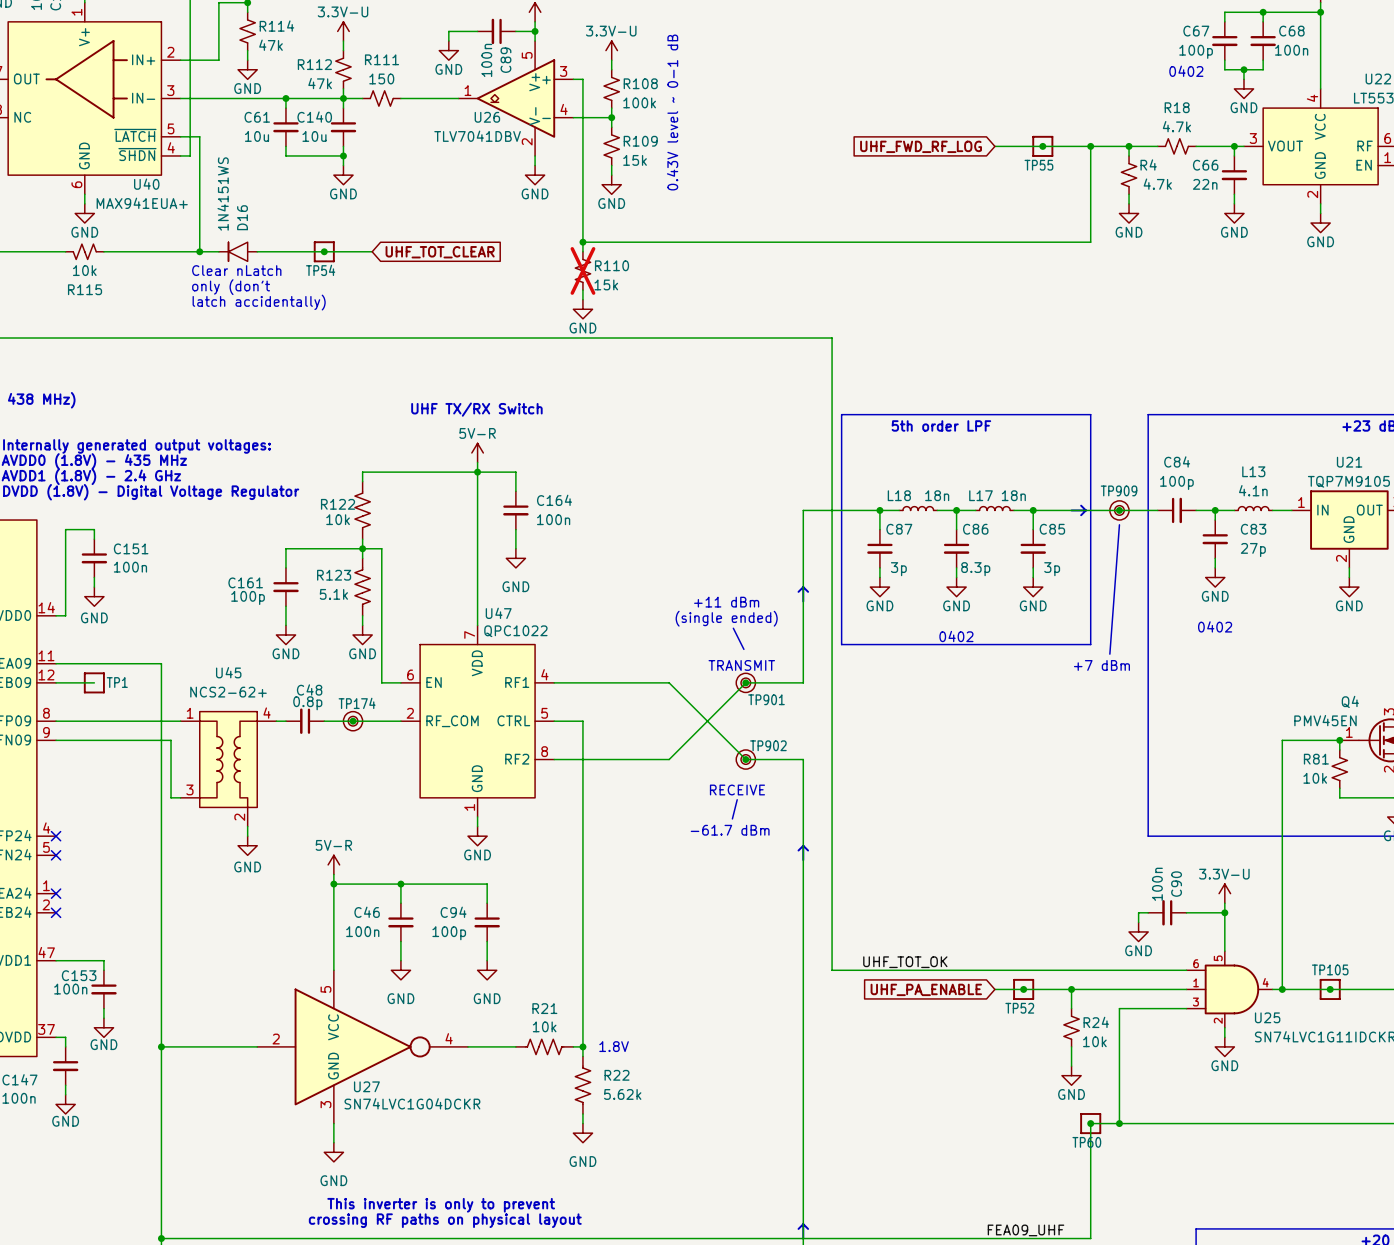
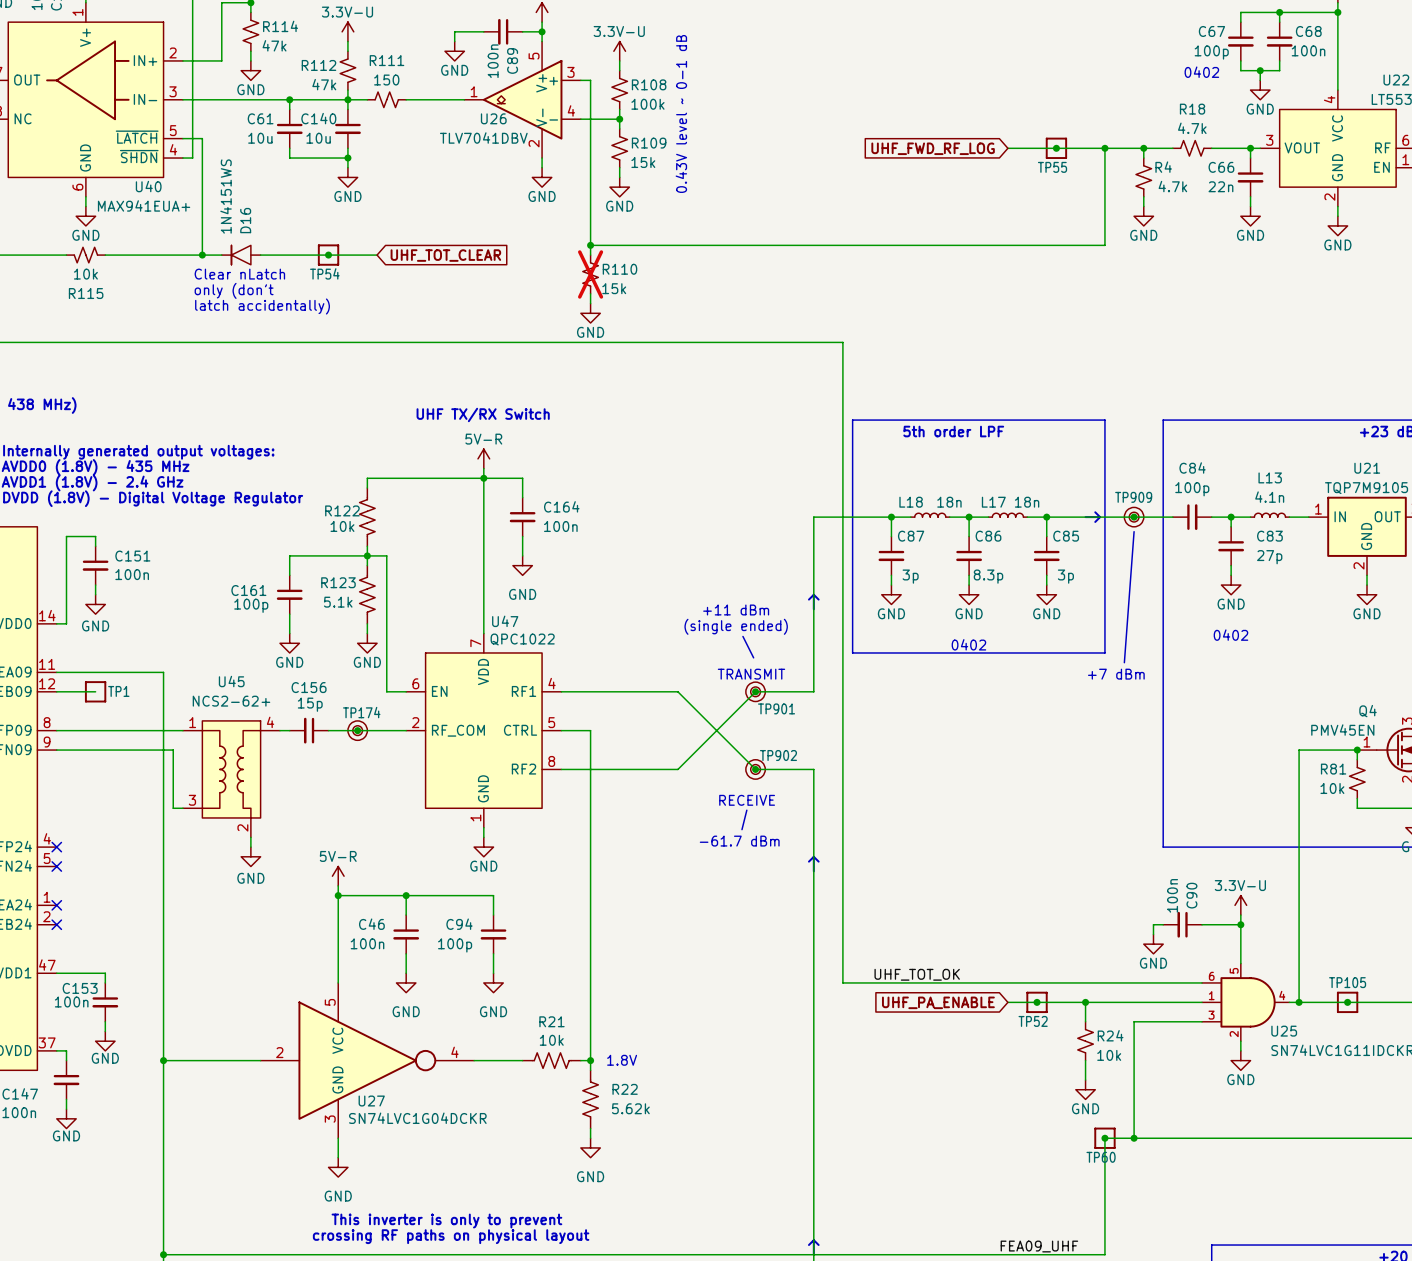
C48 name: C48 (309, 689) -> C156 (309, 687)
C48 value: 0.8p (307, 703) -> 15p (310, 704)

